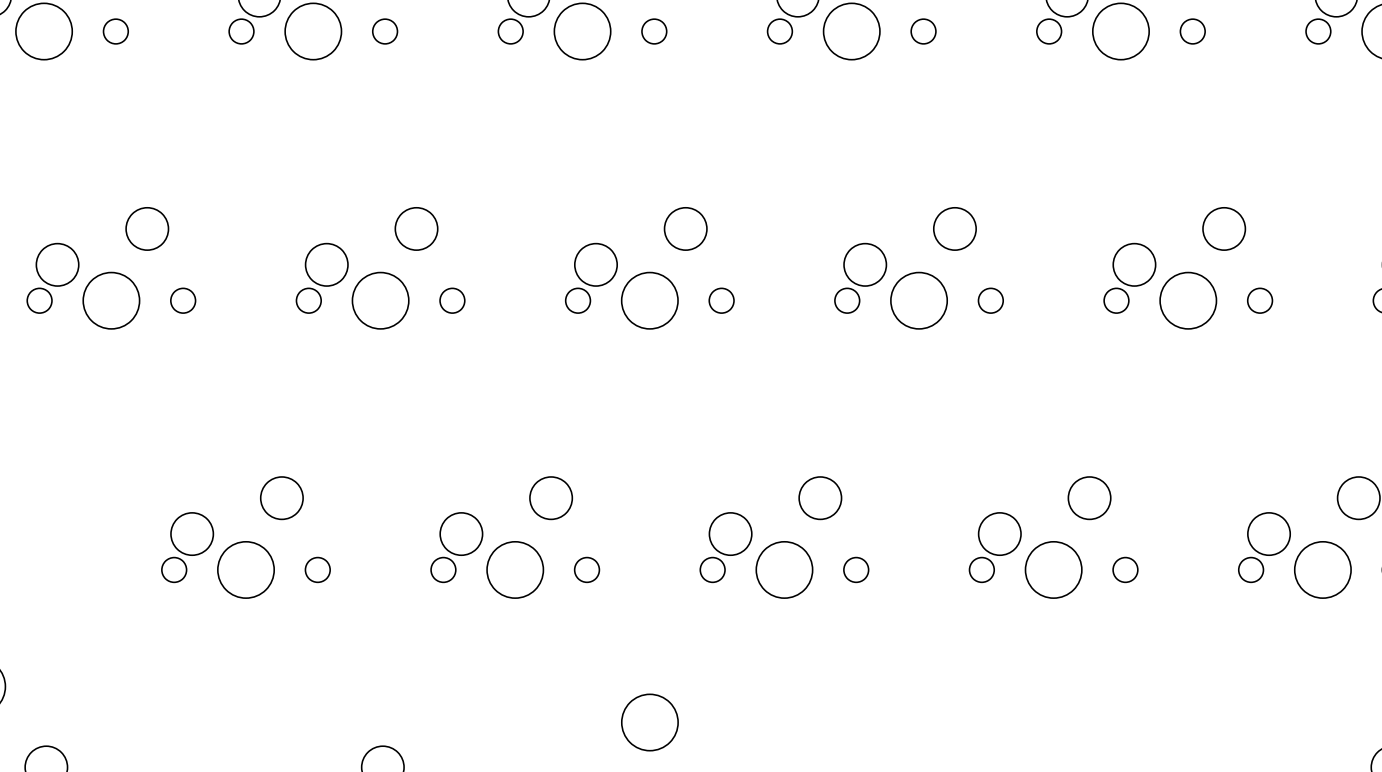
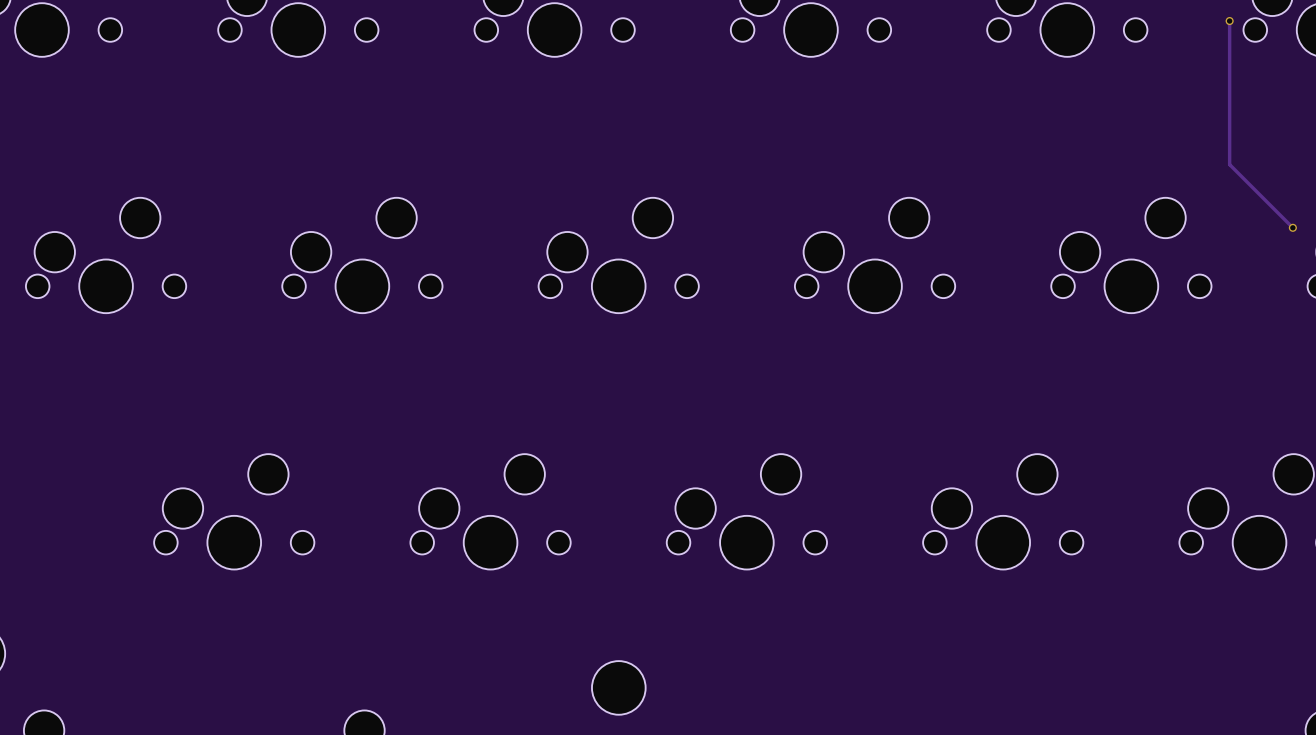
track: none -> (1229, 21) (1229, 164) (1292, 227)
via: none -> (1229, 21)
via: none -> (1292, 227)

